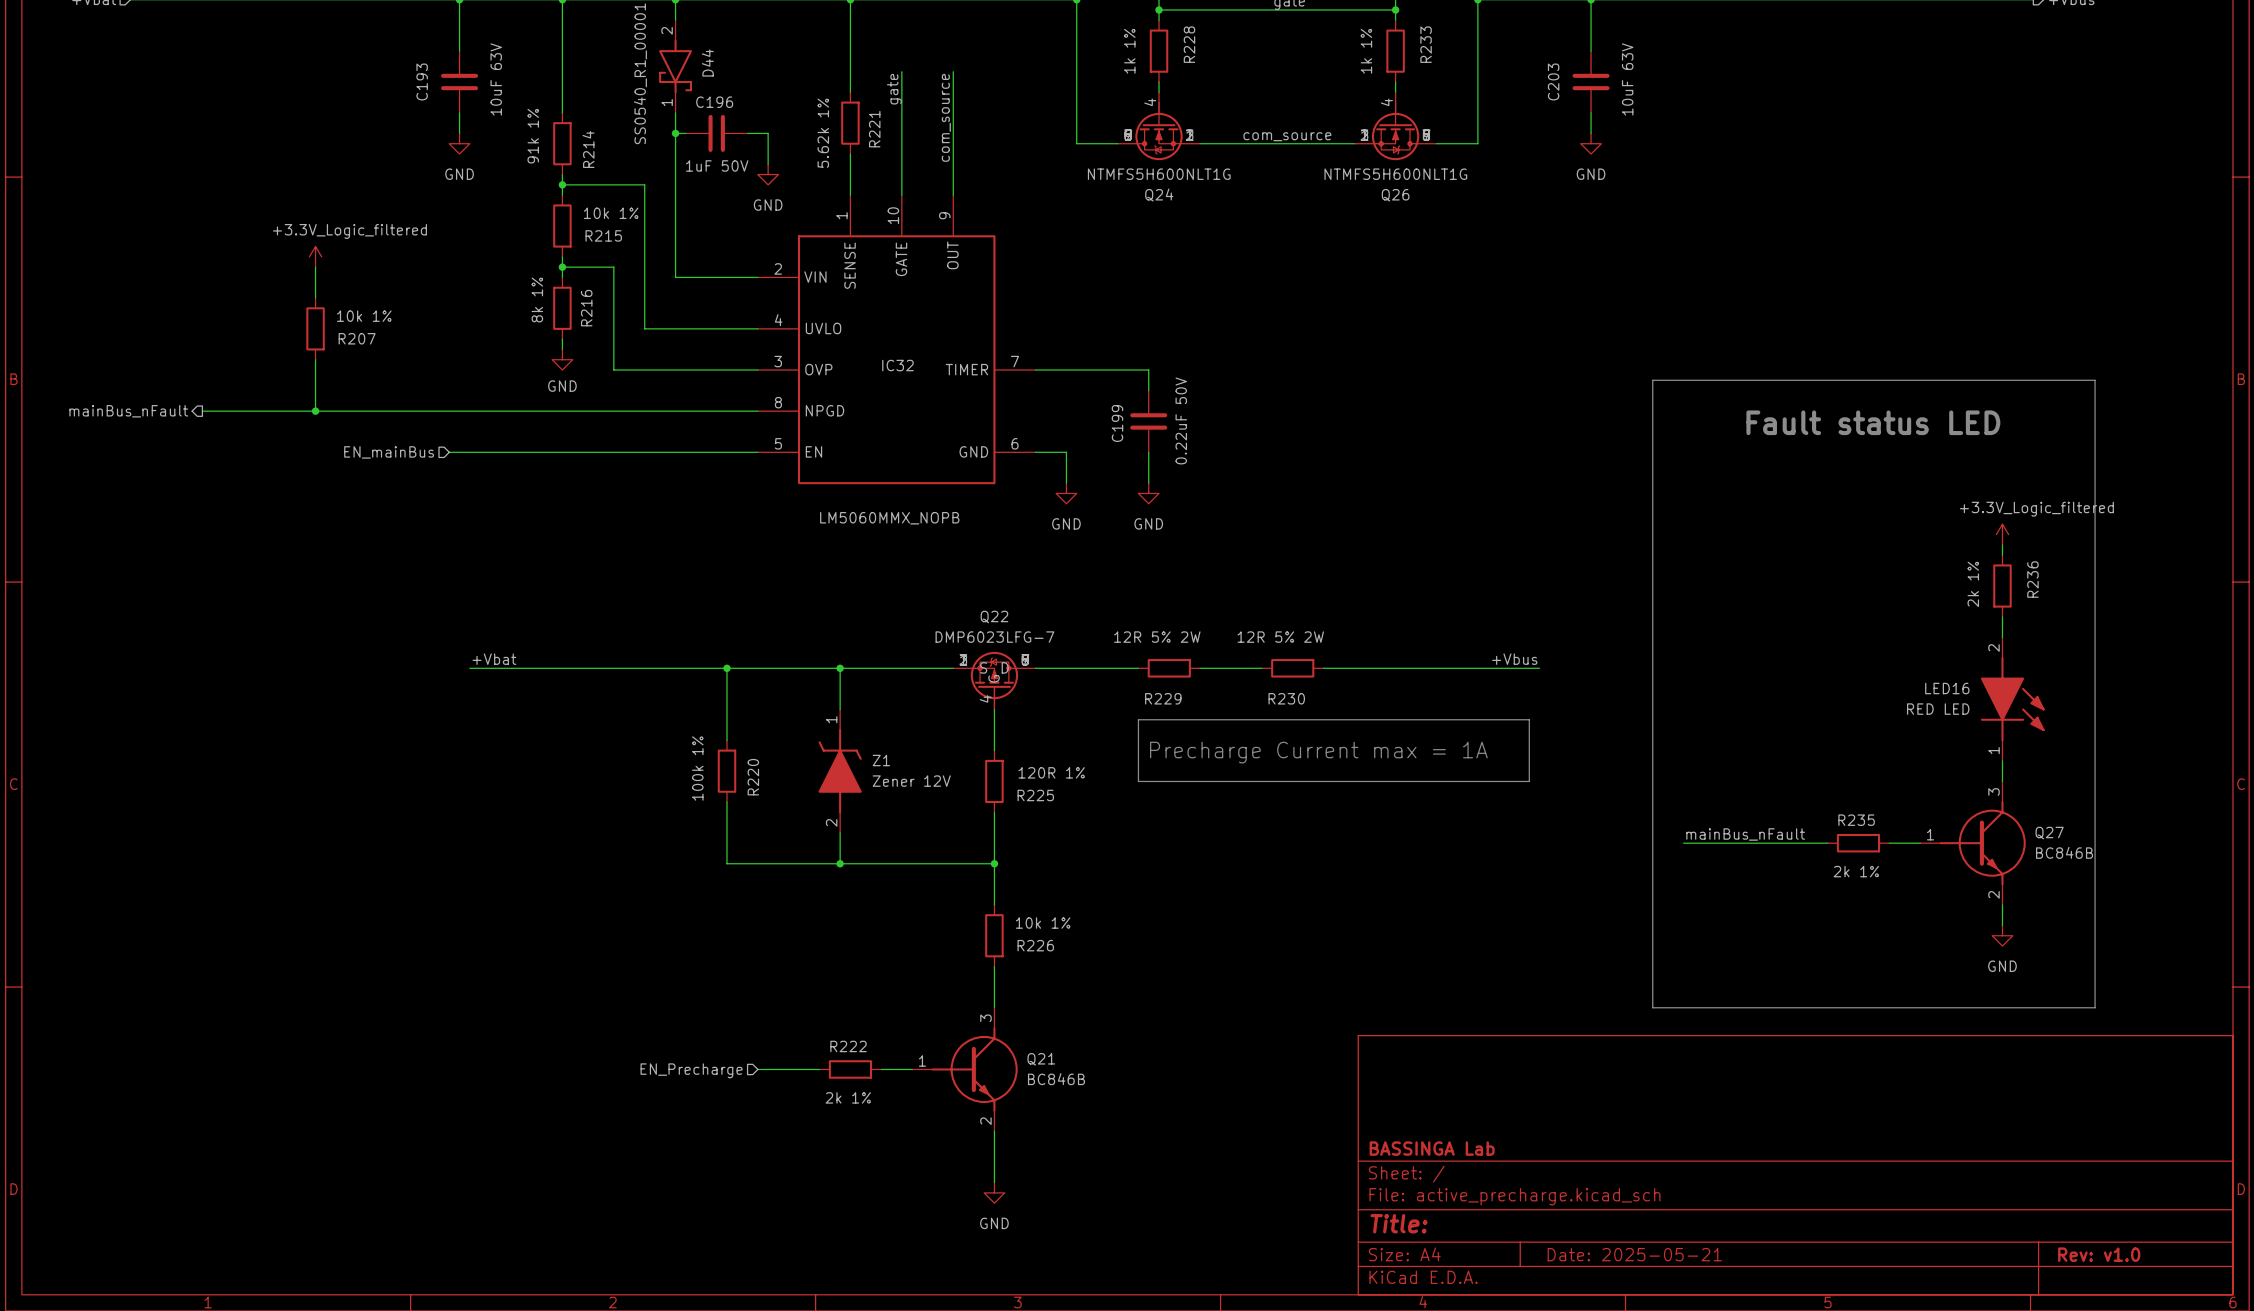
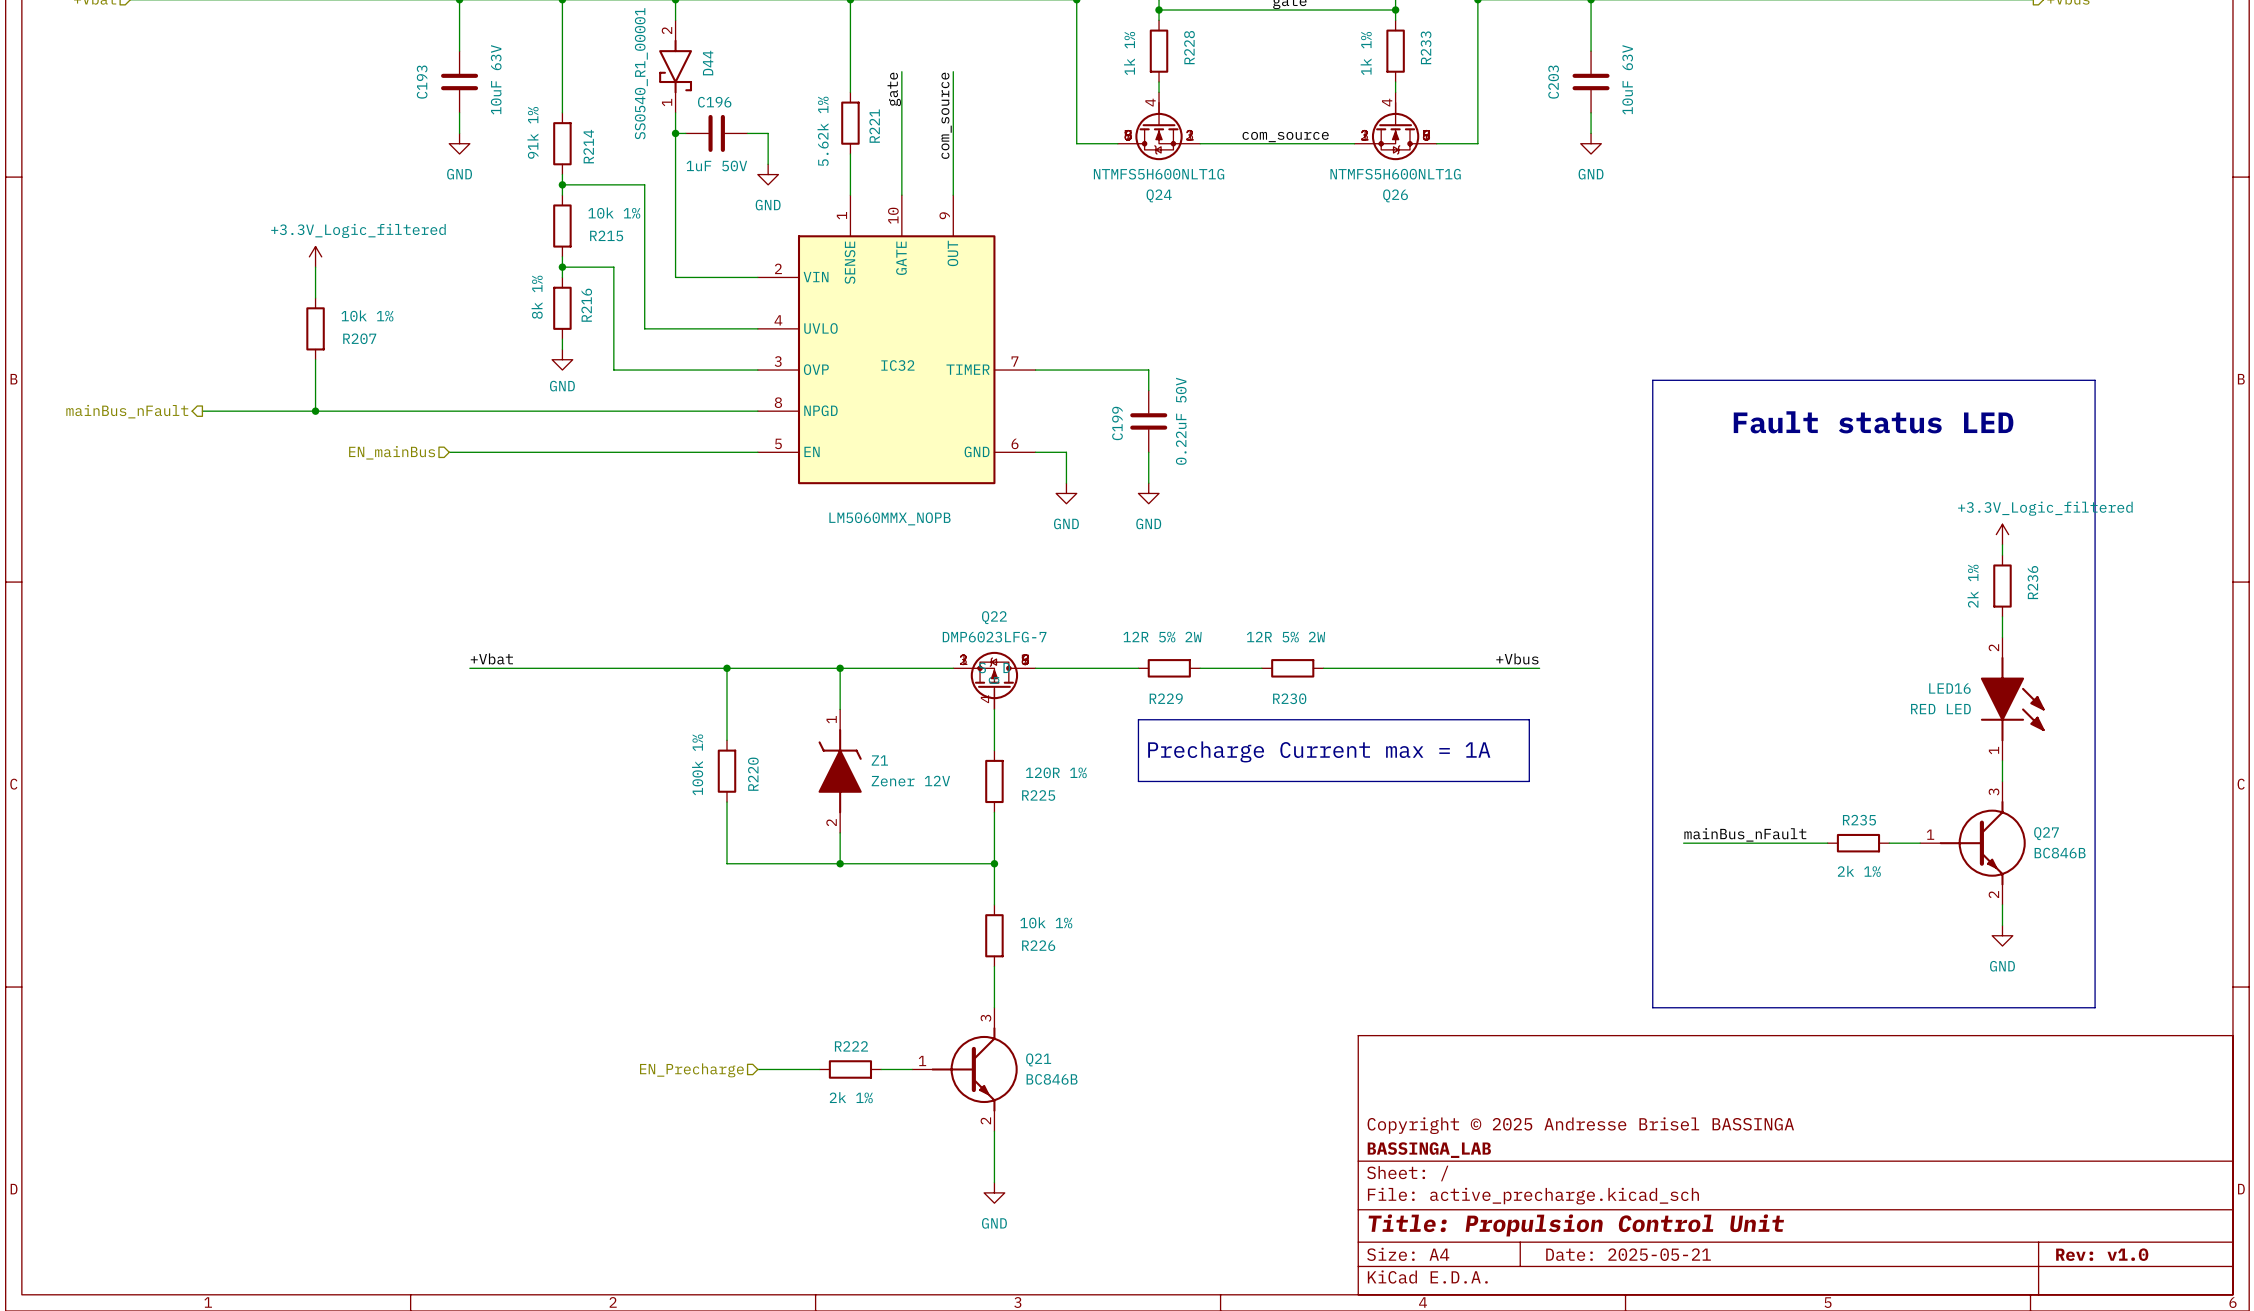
title block: none -> Copyright © 2025 Andresse Brisel BASSINGA (1580, 1125)
title block: BASSINGA Lab (1432, 1148) -> BASSINGA_LAB (1429, 1150)
title block: Title: (1399, 1223) -> Title: Propulsion Control Unit (1576, 1225)

